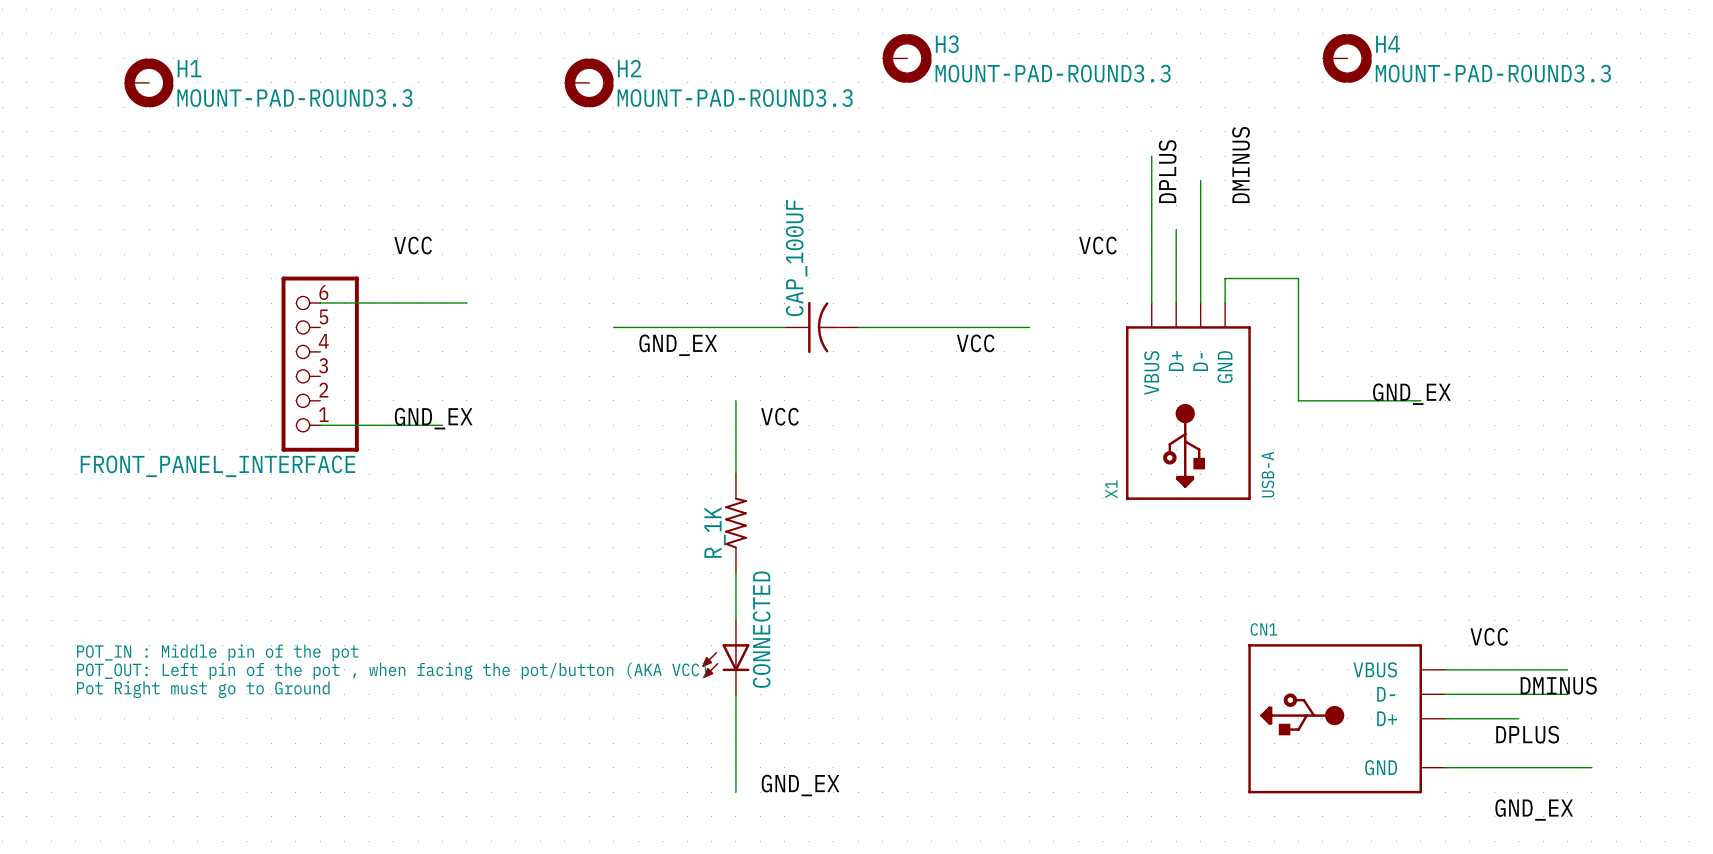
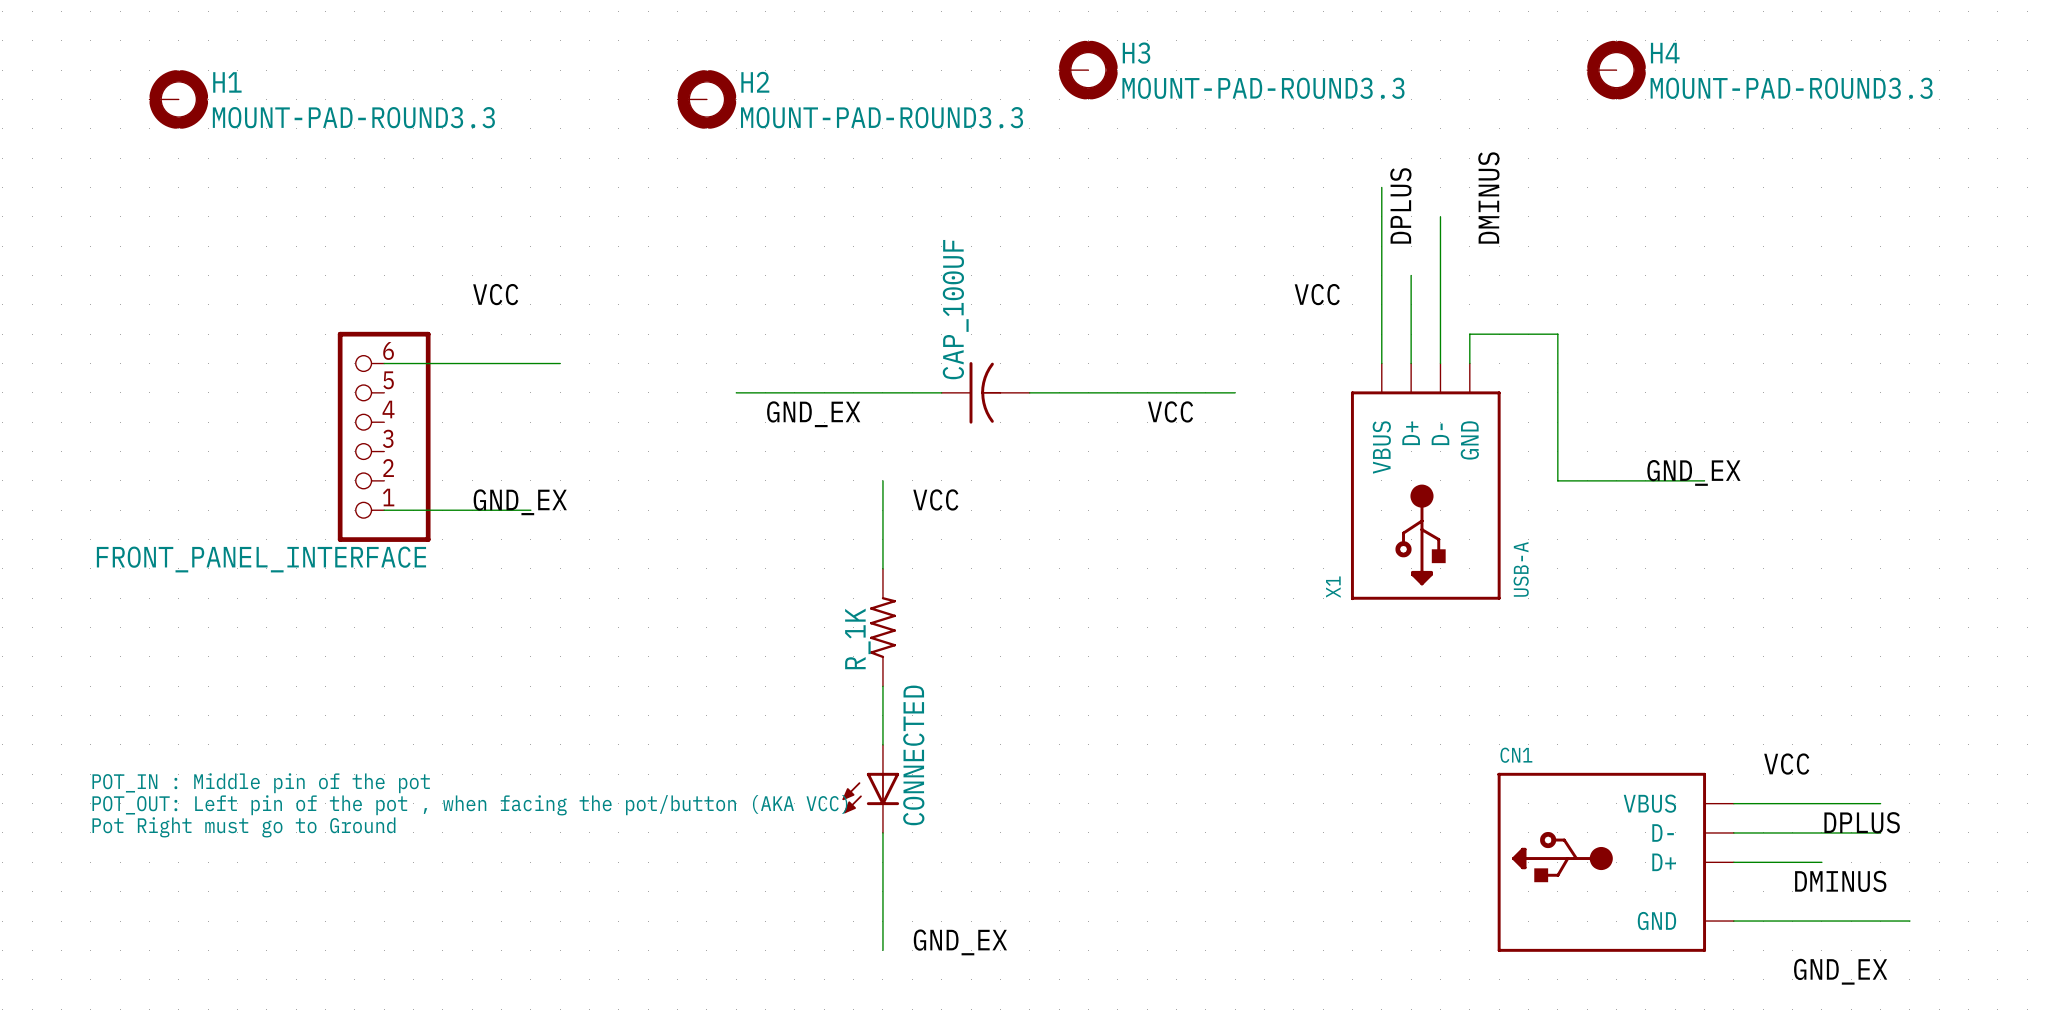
label: DMINUS (1558, 685) -> DPLUS (1862, 822)
label: DPLUS (1527, 734) -> DMINUS (1840, 881)

